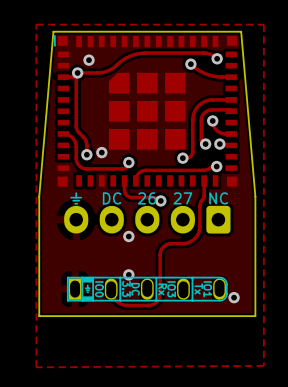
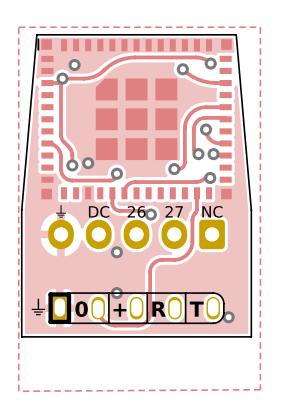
part footprint: [67, 276, 228, 302] -> [48, 292, 225, 325]

